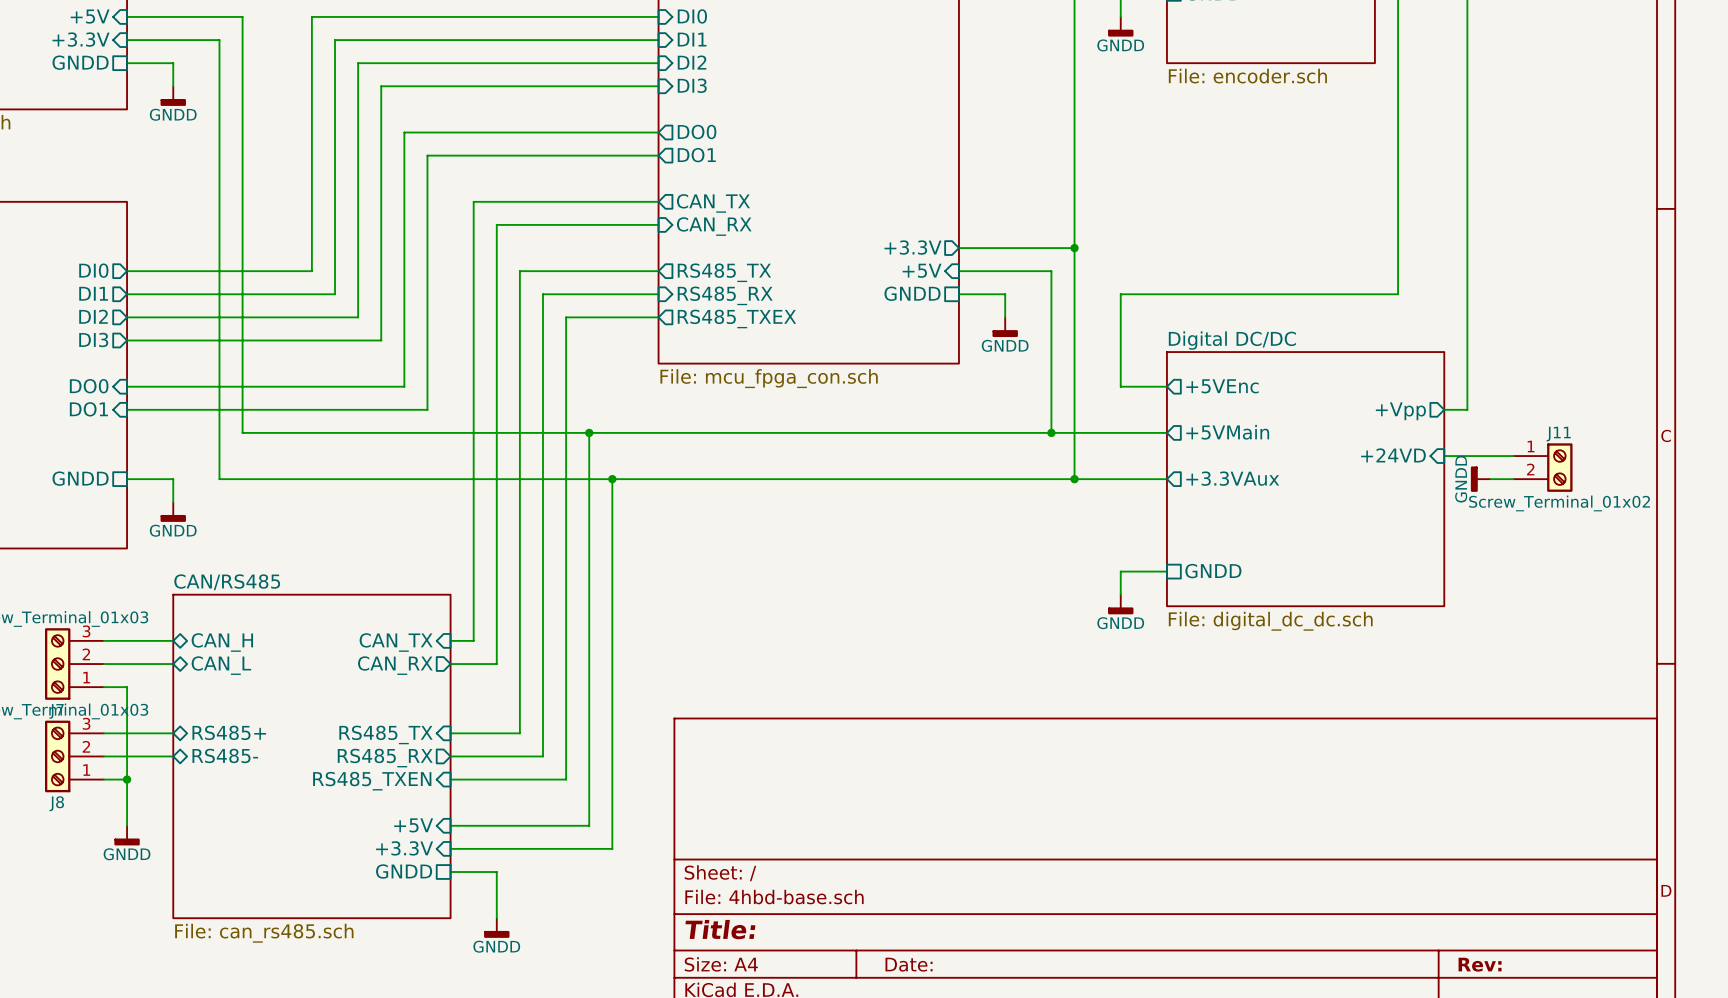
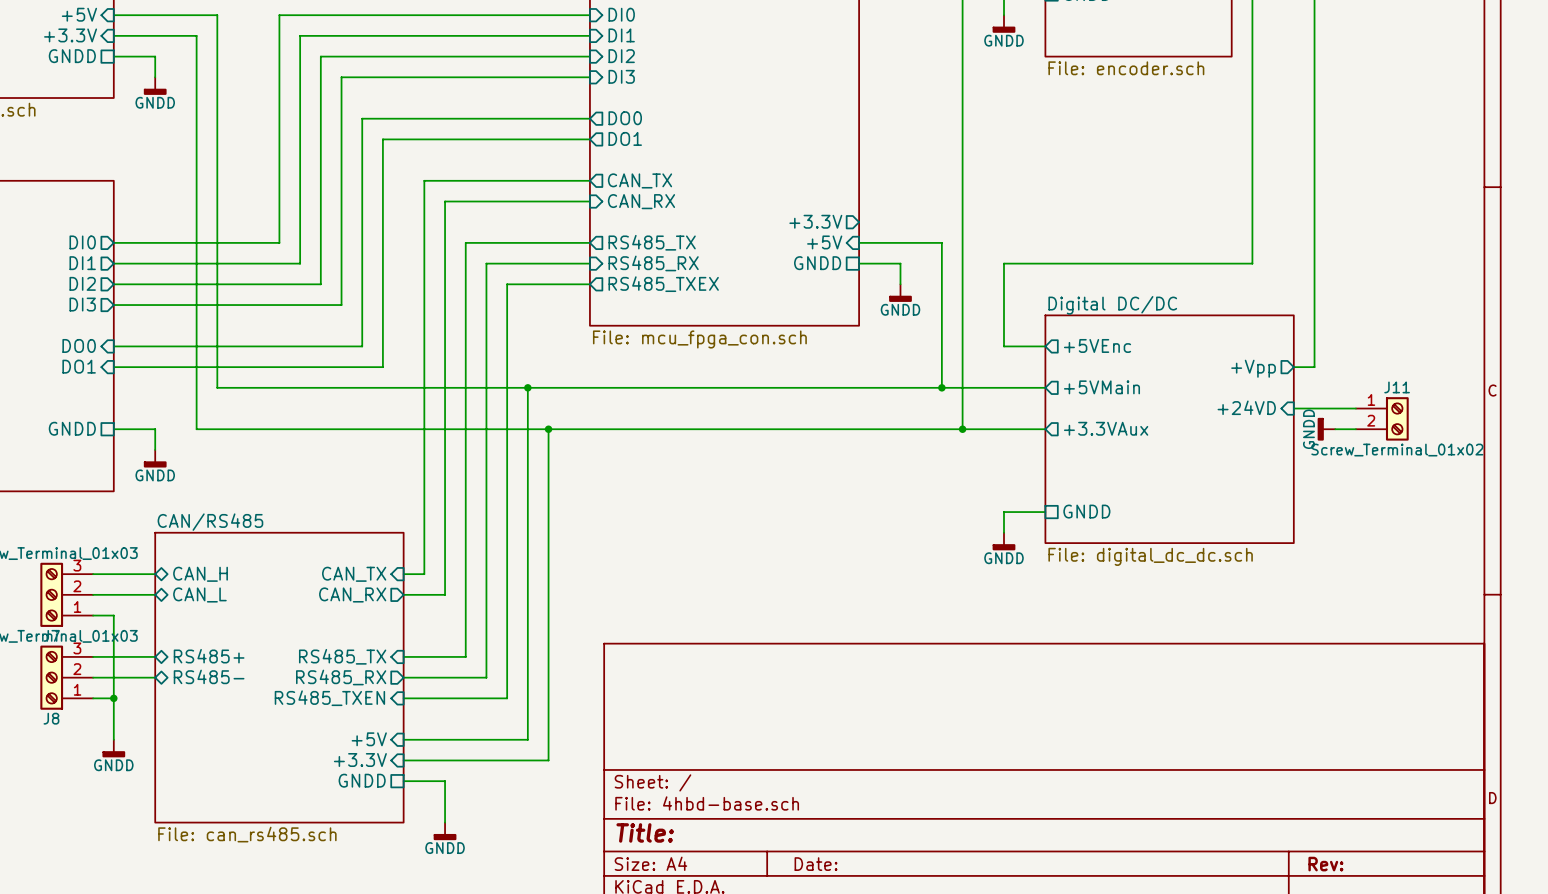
wire: (958, 248) (1074, 248) -> none
junction: (1074, 248) -> none

